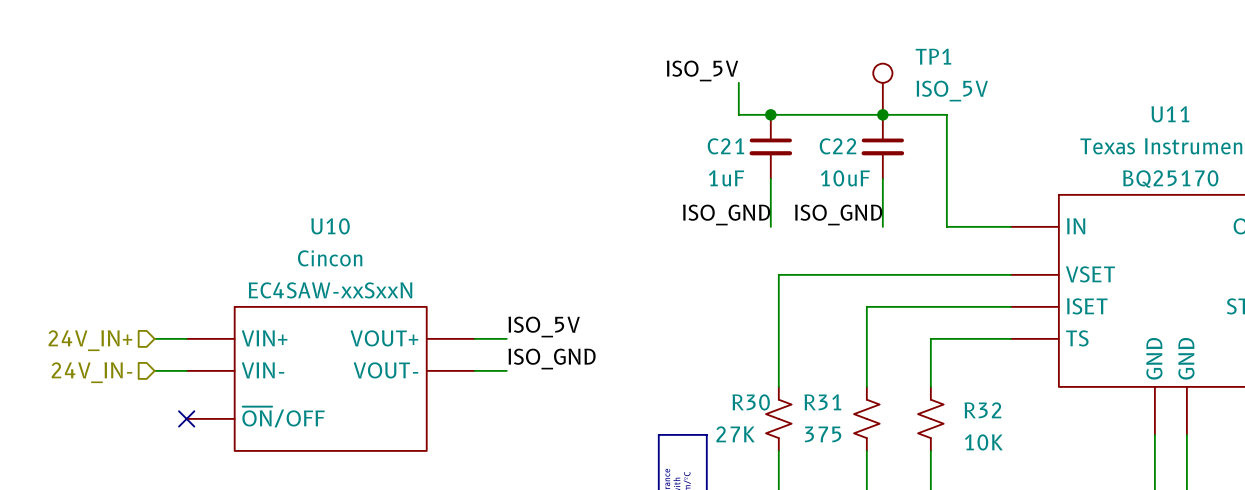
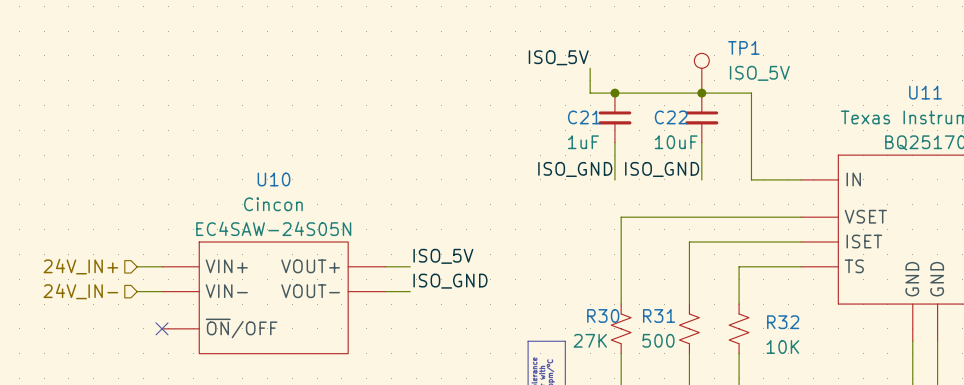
U10 text: EC4SAW-xxSxxN (330, 290) -> EC4SAW-24S05N (273, 228)
R31 value: 375 (823, 434) -> 500 (658, 340)

